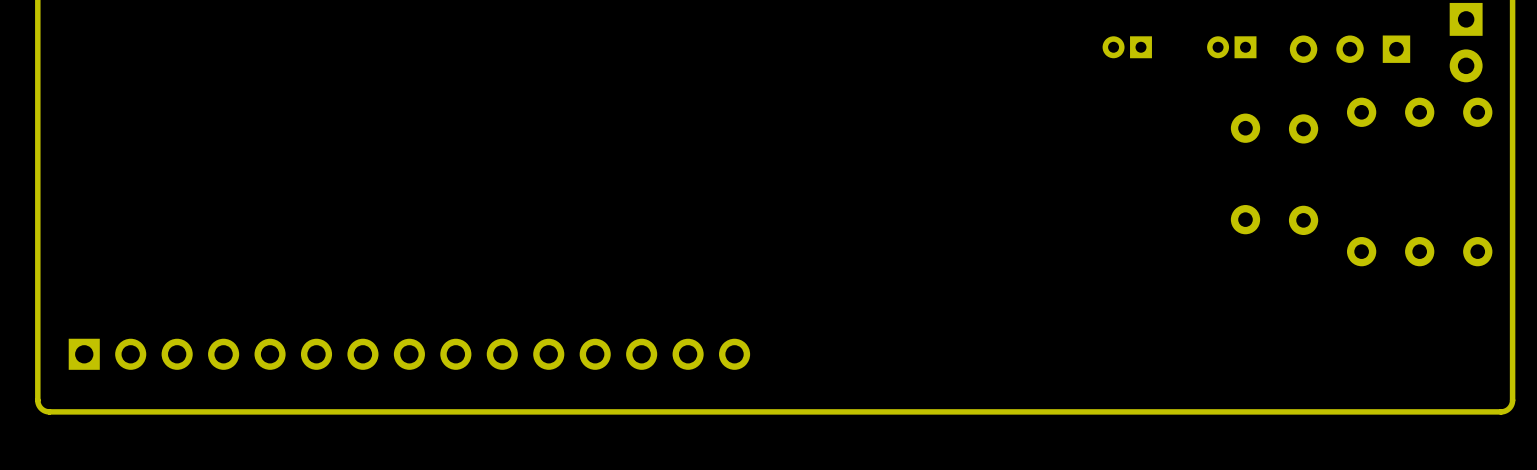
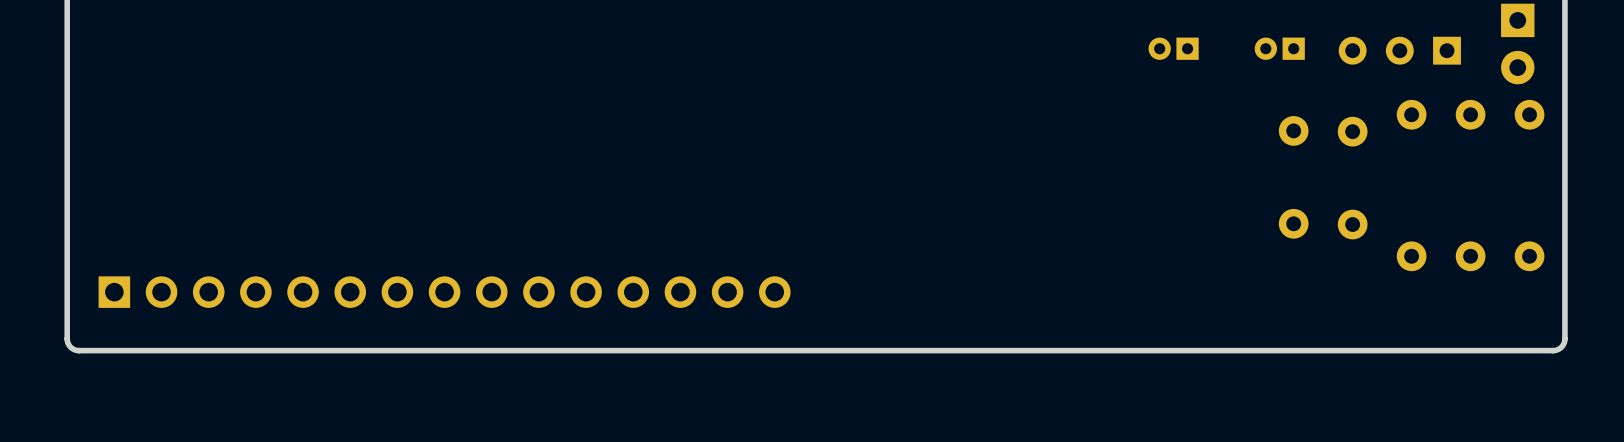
board edge: (1512, 332) (1512, 401) (1508, 409) (1500, 411) (49, 411) (42, 409) (37, 401) (37, 332) -> (1564, 338) (1561, 347) (1553, 350) (78, 350) (70, 347) (67, 338)
part position: (409, 354) -> (444, 292)

